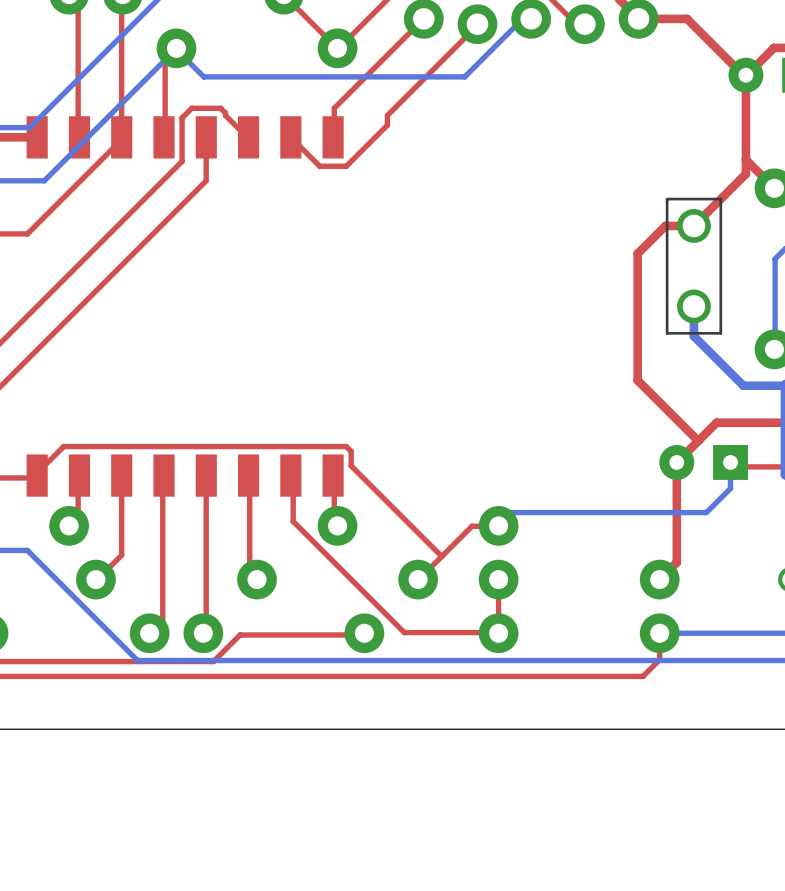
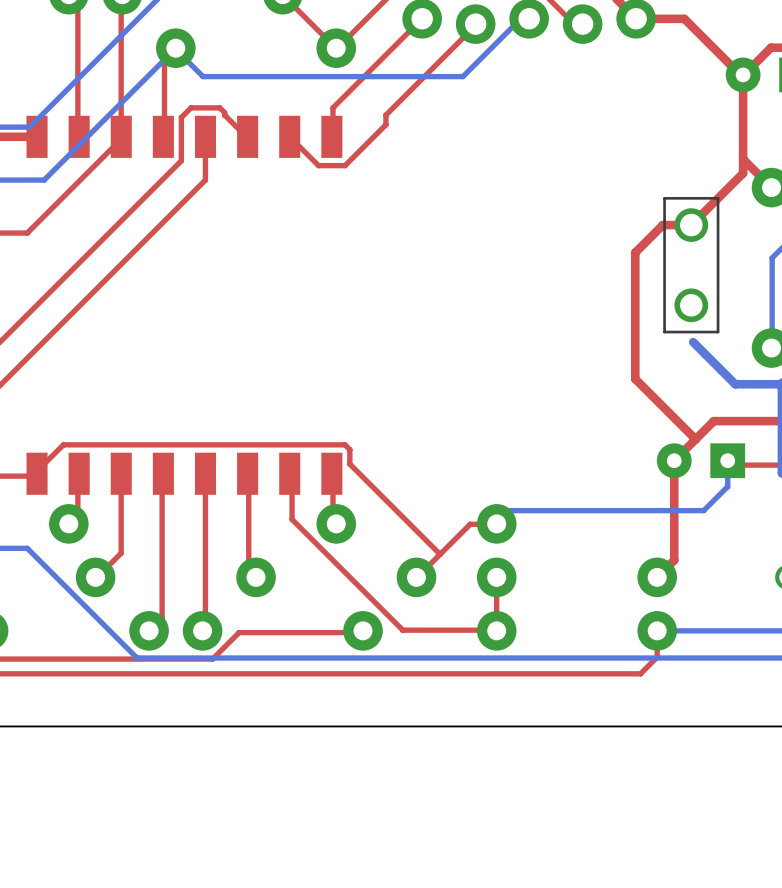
bottom track: (693, 306) (693, 336) (743, 385) -> (693, 342) (735, 384) (740, 384)

